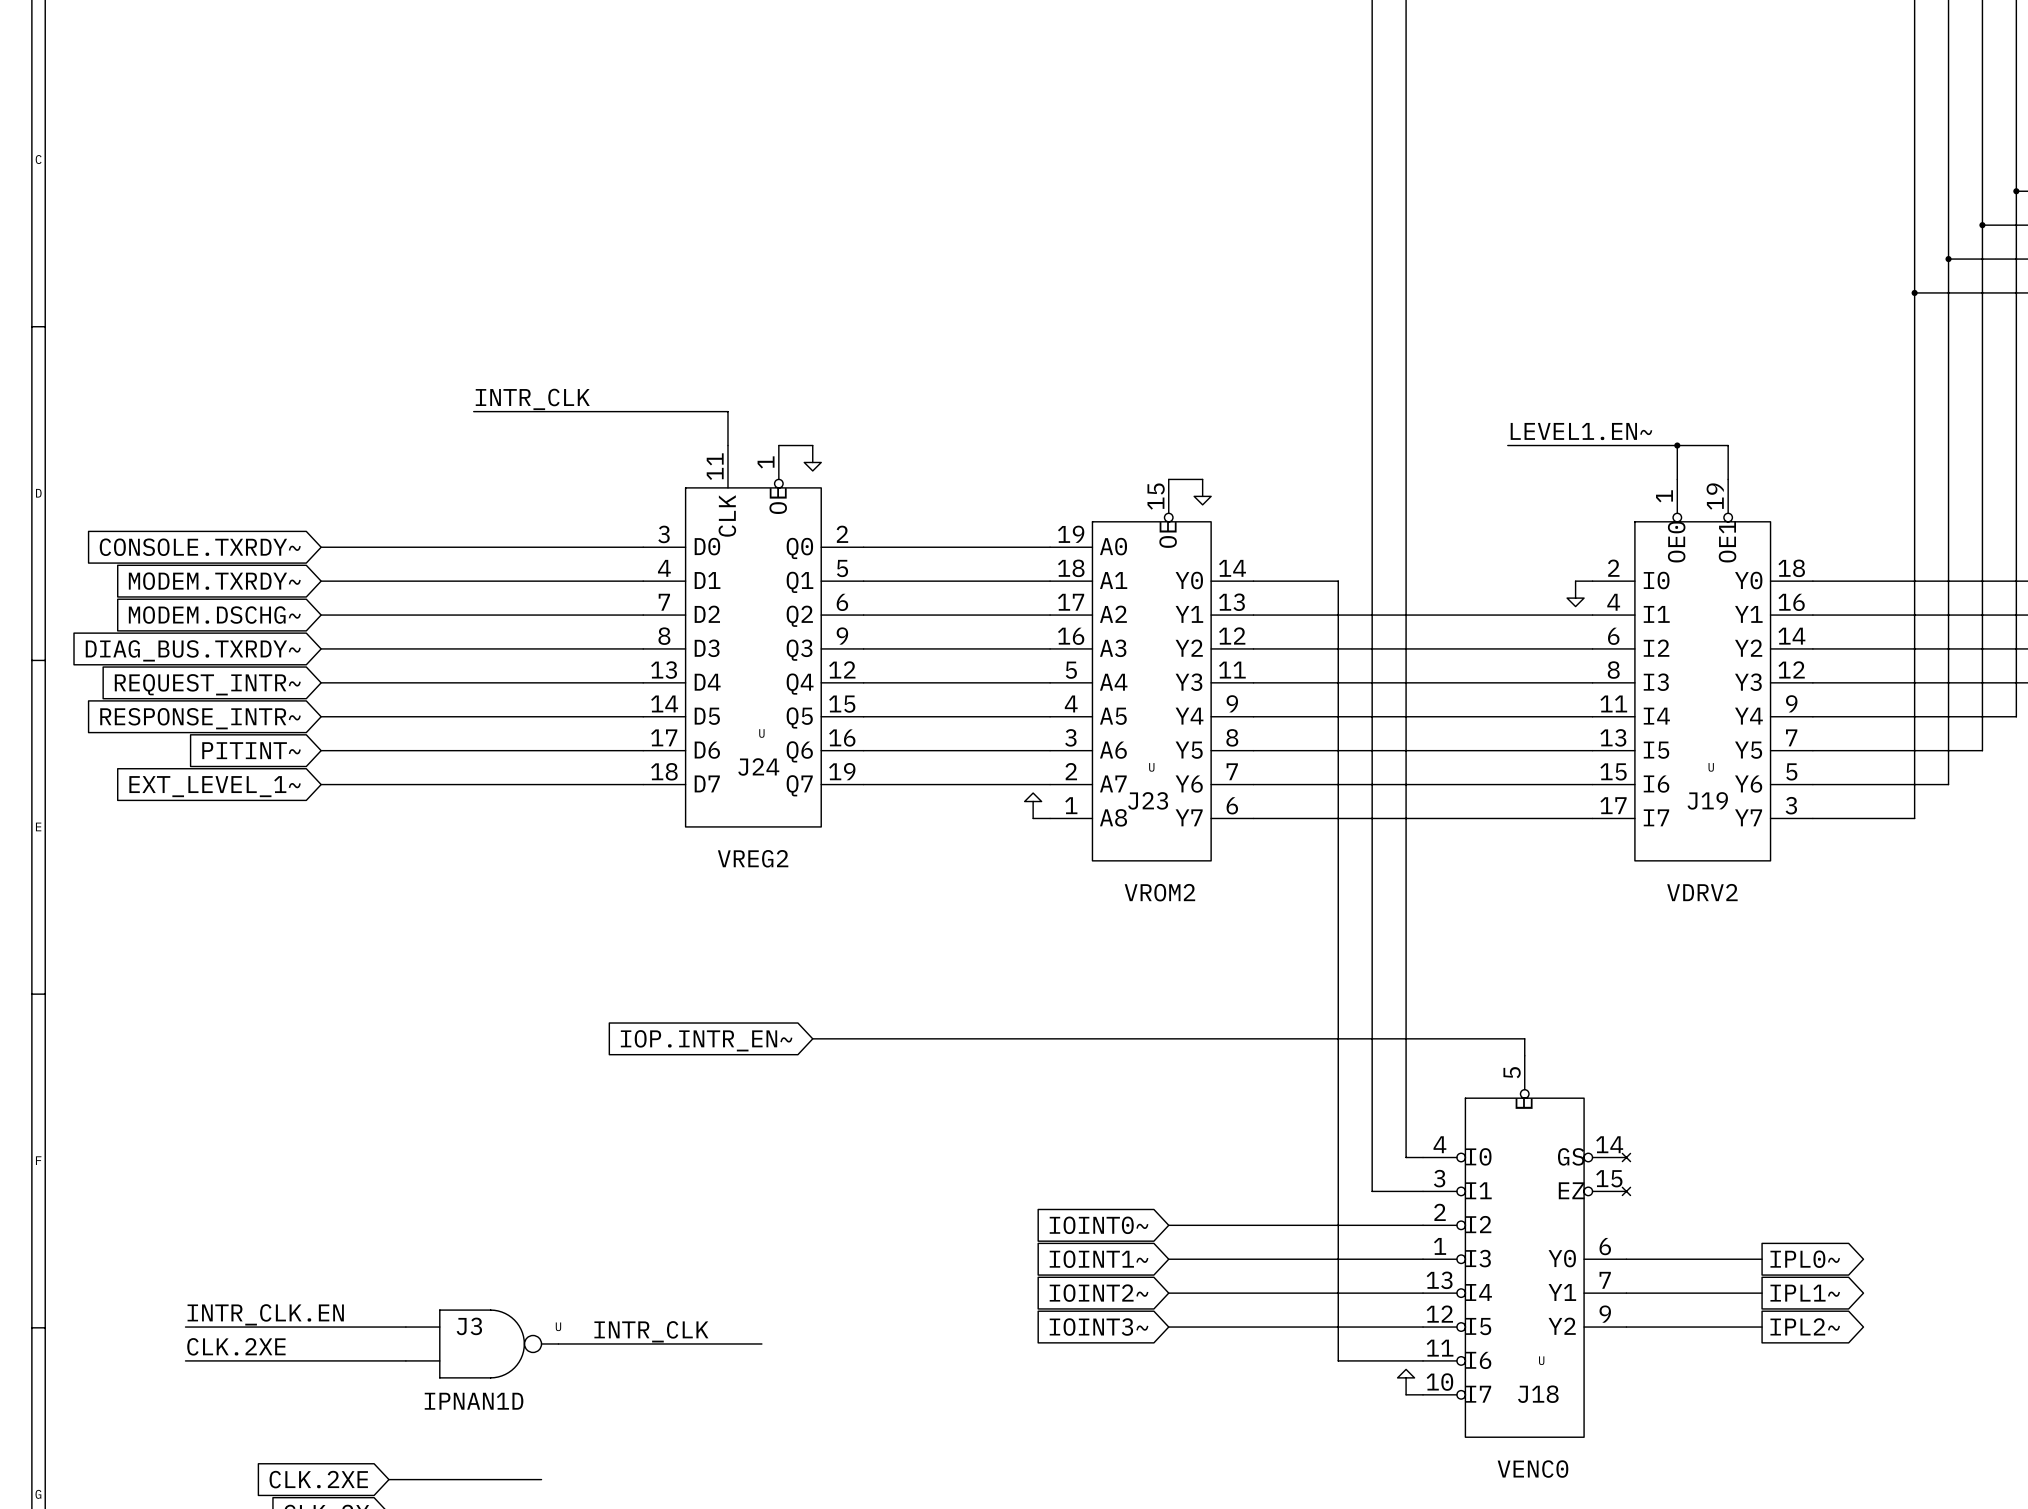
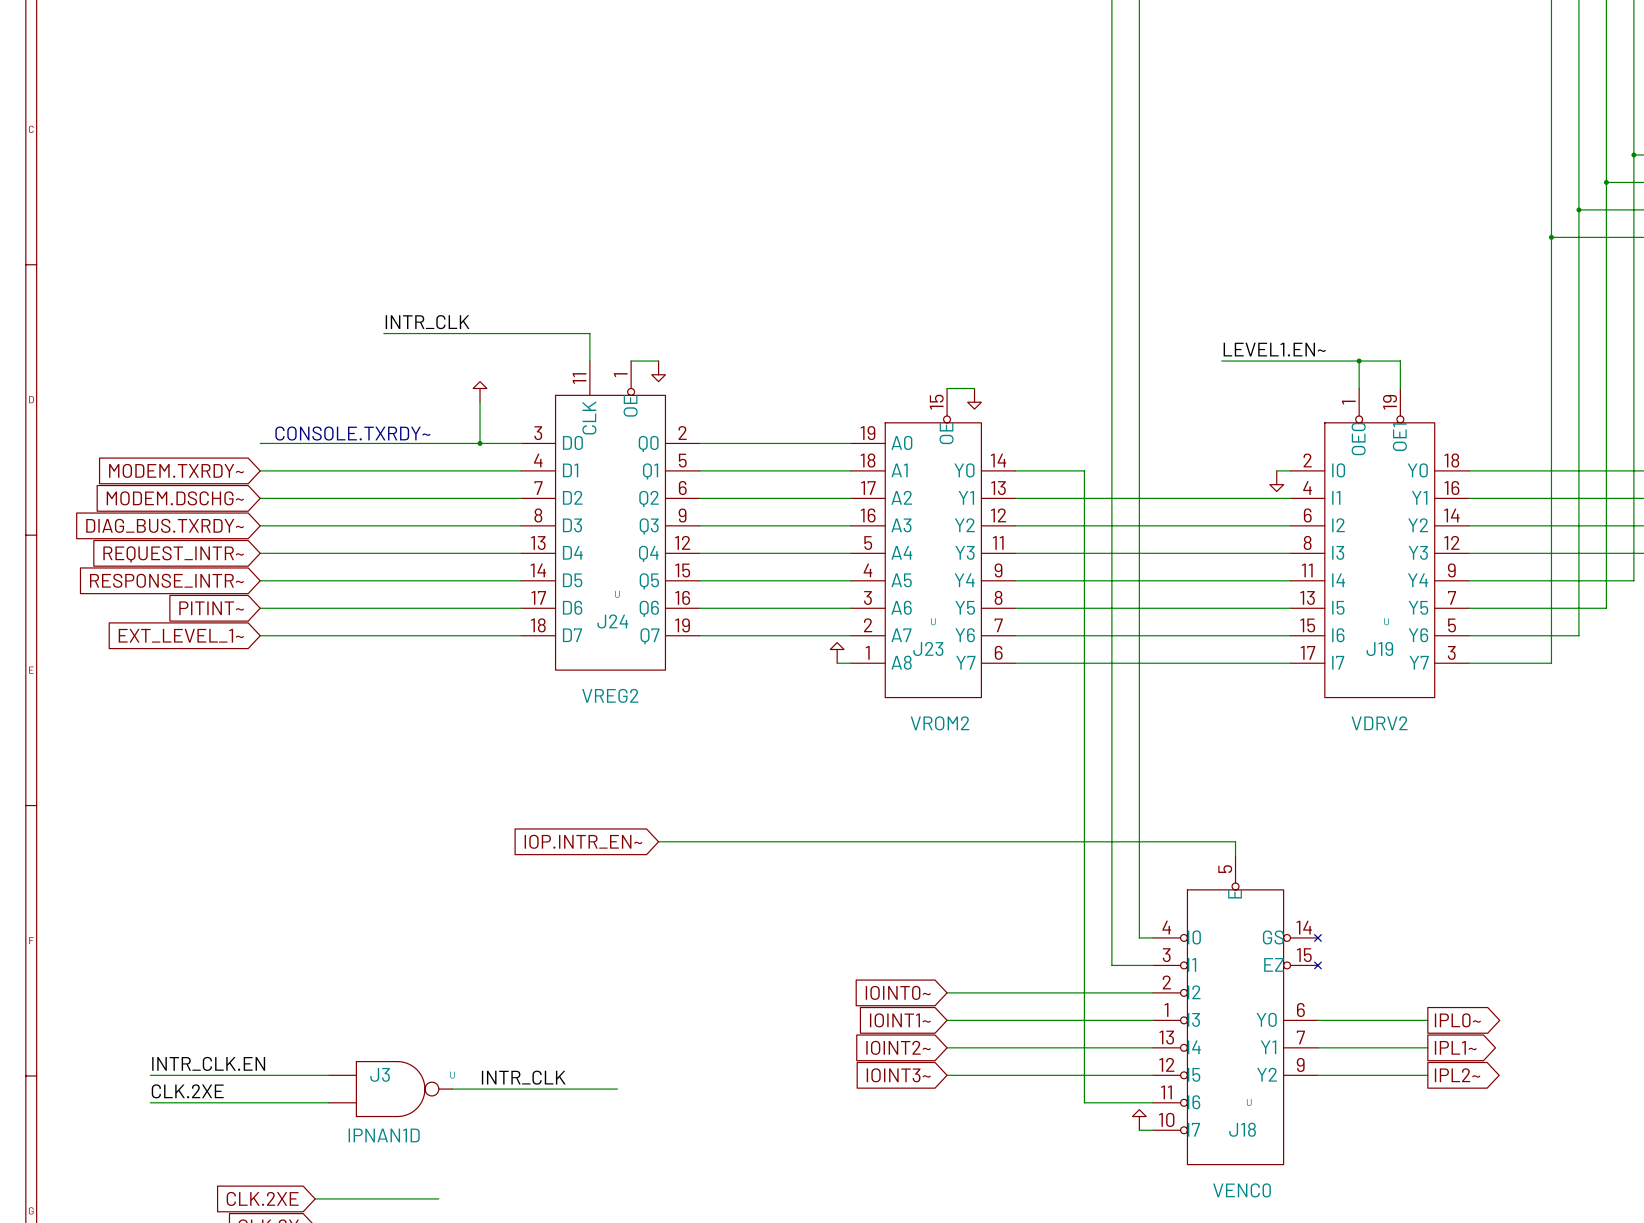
power symbol: none -> (480, 391)
wire: none -> (480, 402) (480, 443)
text: none -> CONSOLE.TXRDY~ (352, 433)
global label: CONSOLE.TXRDY~ (200, 547) -> none
junction: none -> (480, 443)

